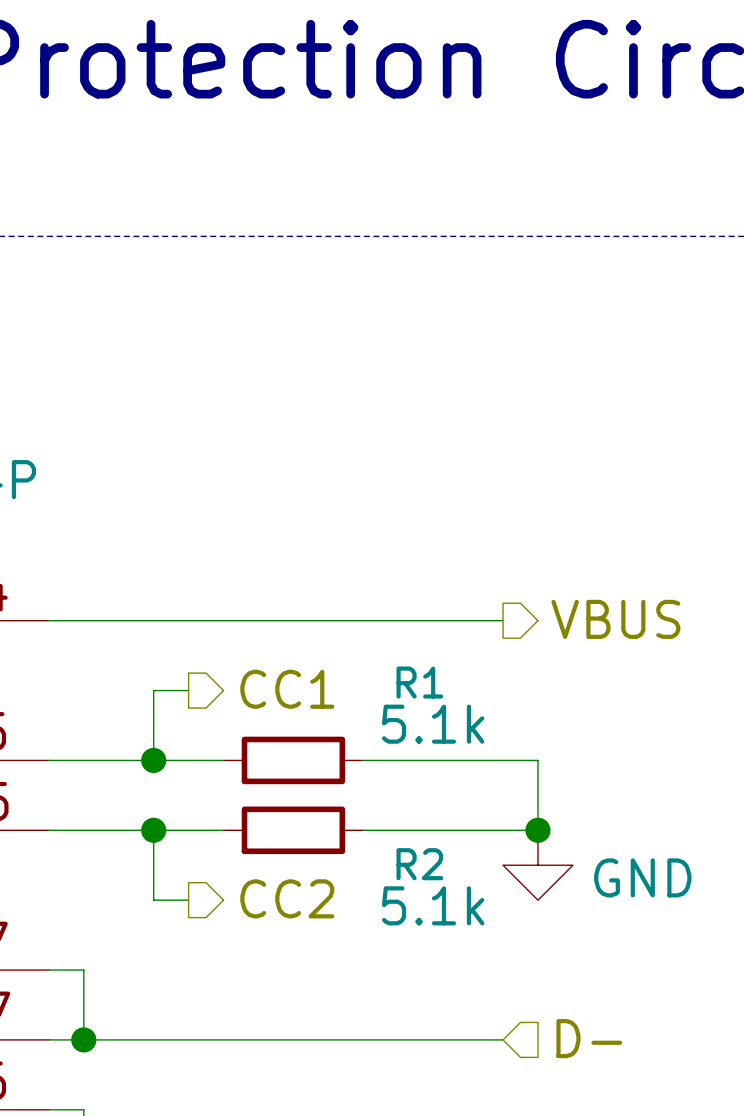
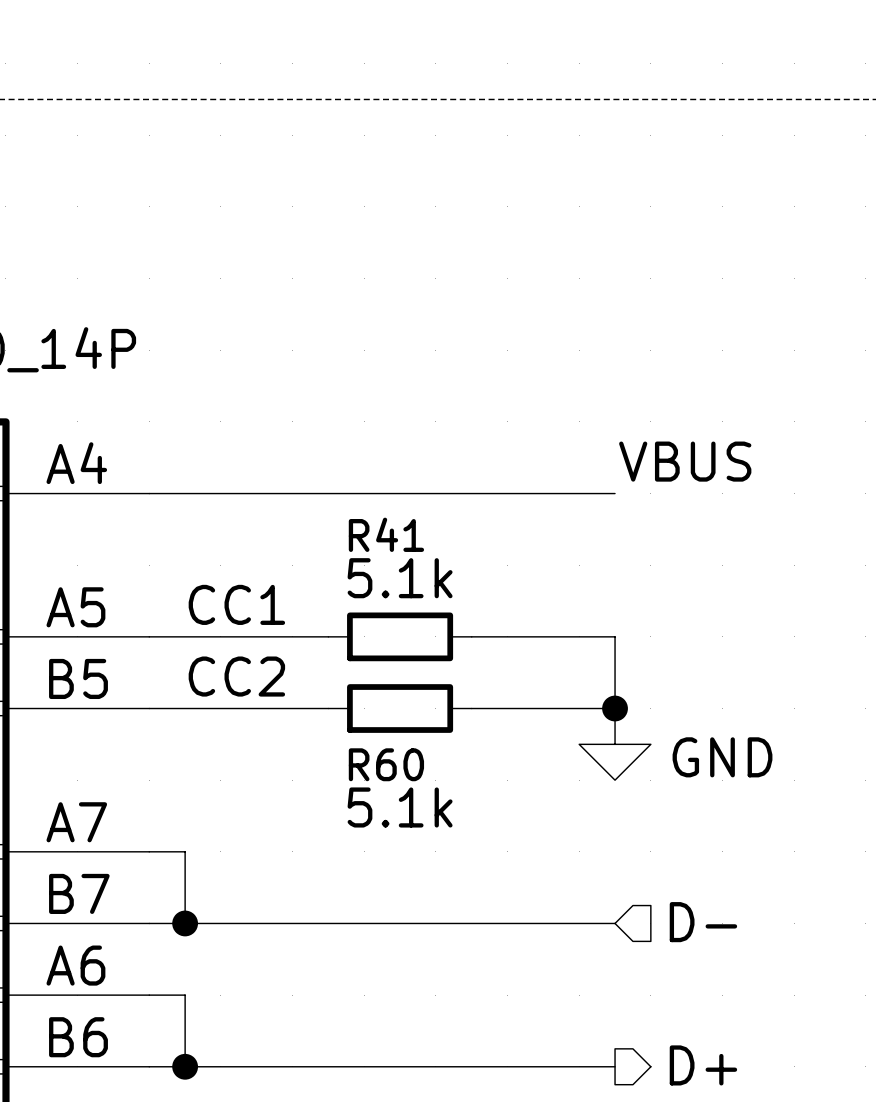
label: none -> VBUS (685, 461)
hierarchical label: VBUS (615, 619) -> none
R1 name: R1 (419, 682) -> R41 (386, 534)
hierarchical label: CC1 (287, 689) -> none
wire: (188, 690) (153, 690) (153, 760) -> none
R1 value position: 5.1k (433, 724) -> 5.1k (400, 578)
label: none -> CC1 (236, 604)
junction: (153, 760) -> none
wire: (503, 760) (537, 760) (537, 830) (503, 830) -> (615, 636) (615, 708)
label: none -> CC2 (236, 676)
wire: (153, 830) (153, 900) (188, 900) -> none
junction: (153, 830) -> none
junction position: (537, 830) -> (615, 708)
R2 name: R2 (419, 864) -> R60 (386, 764)
power symbol position: GND (537, 865) -> GND (615, 744)
hierarchical label: CC2 (287, 898) -> none
R2 value position: 5.1k (433, 905) -> 5.1k (400, 807)

